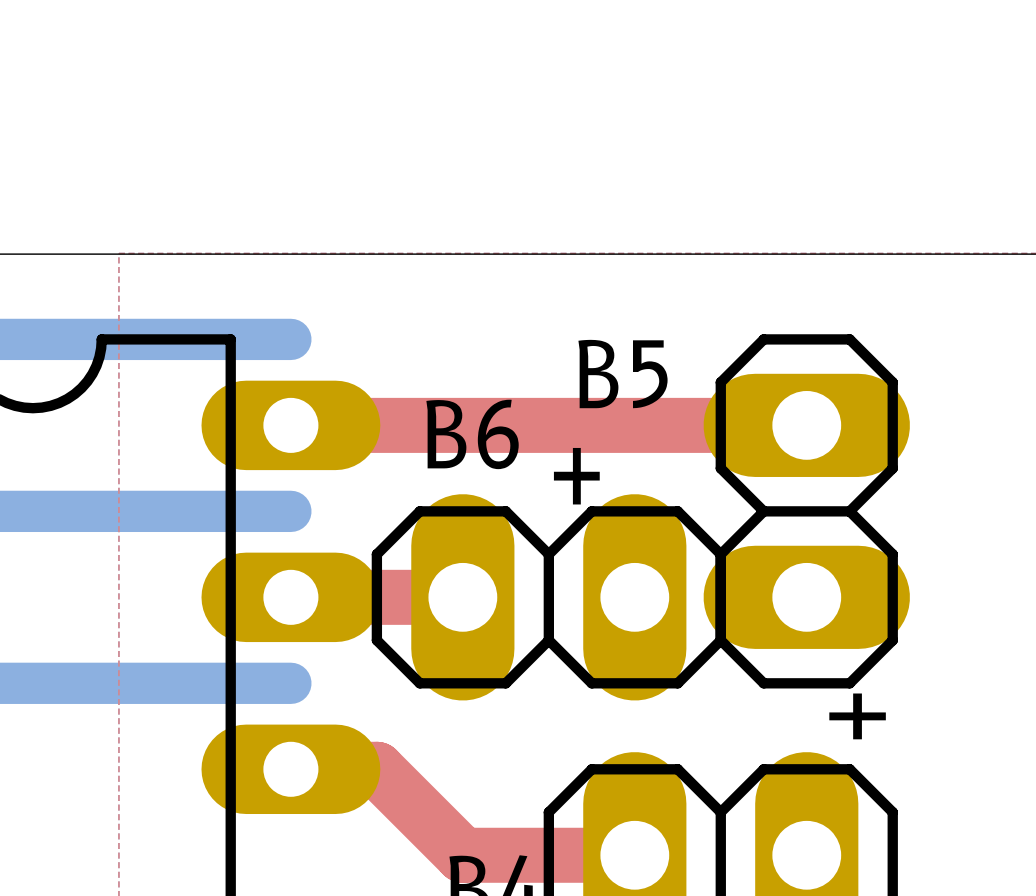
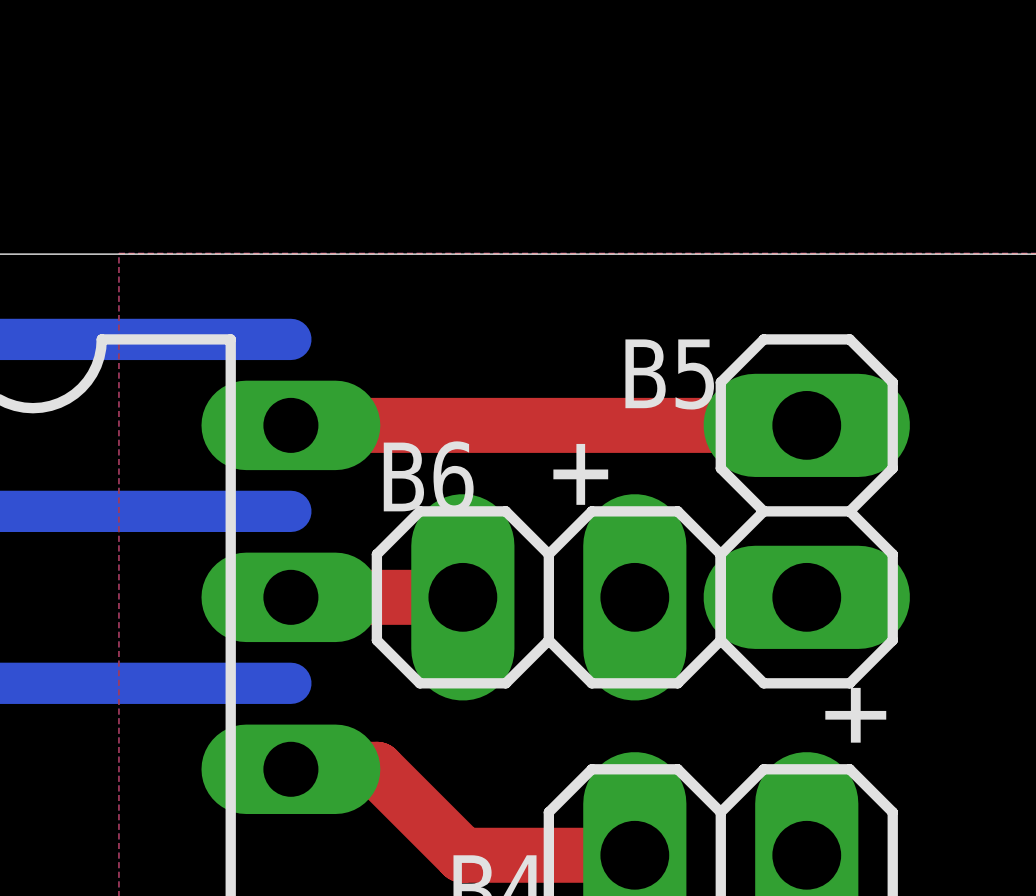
text position: B5 (623, 374) -> B5 (669, 374)
text position: B6 (472, 434) -> B6 (428, 477)

